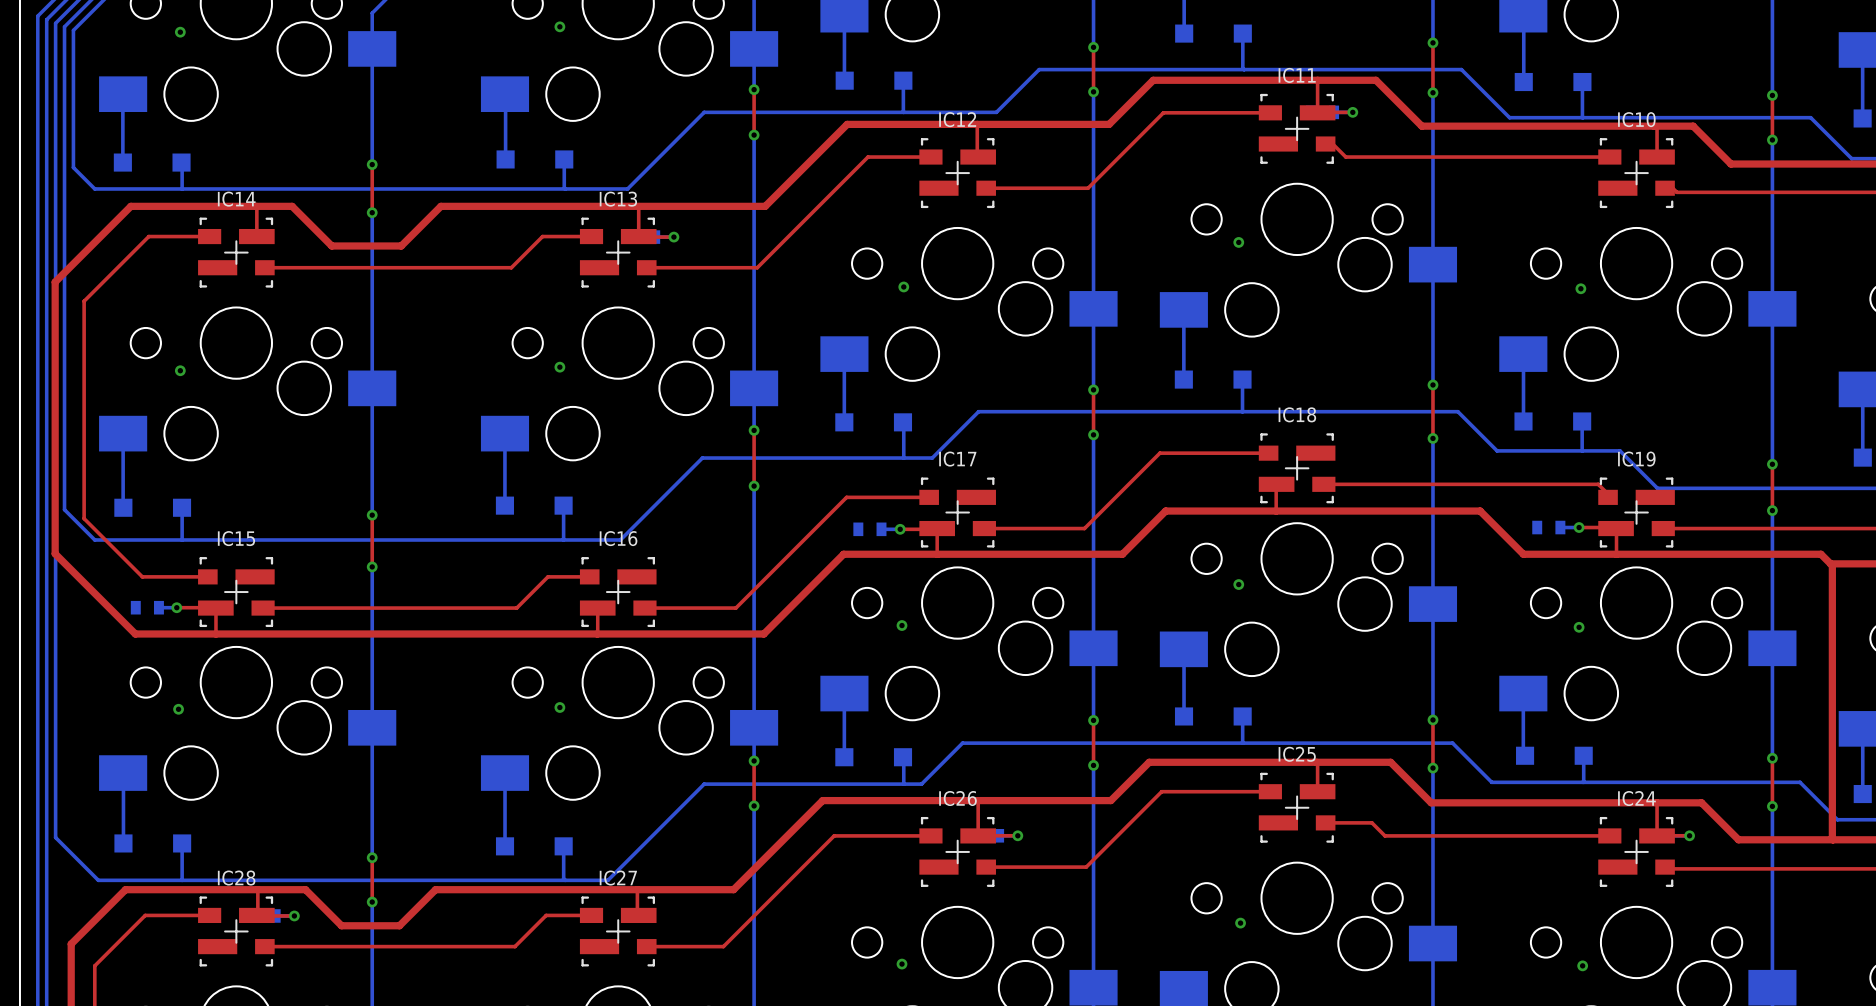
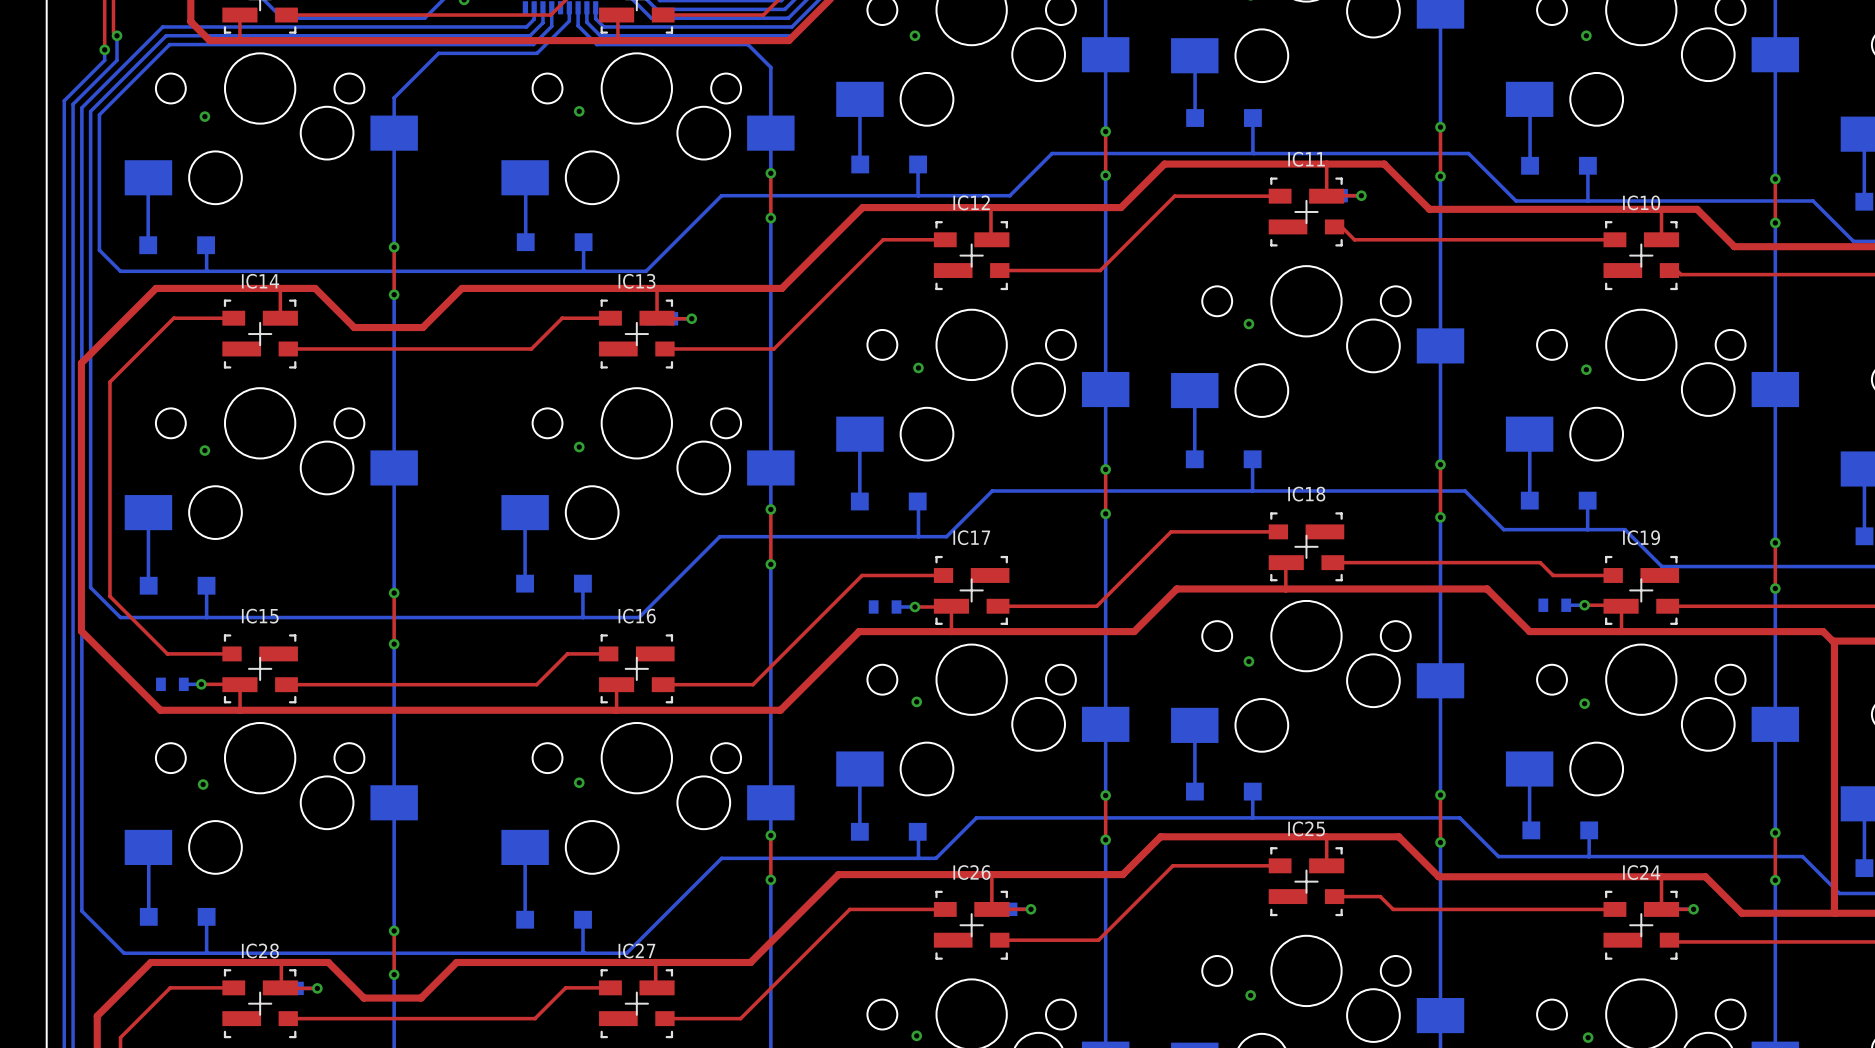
top track: (1534, 484) (1598, 484) (1608, 494) (1608, 497) -> (1540, 562) (1553, 575) (1613, 575)

